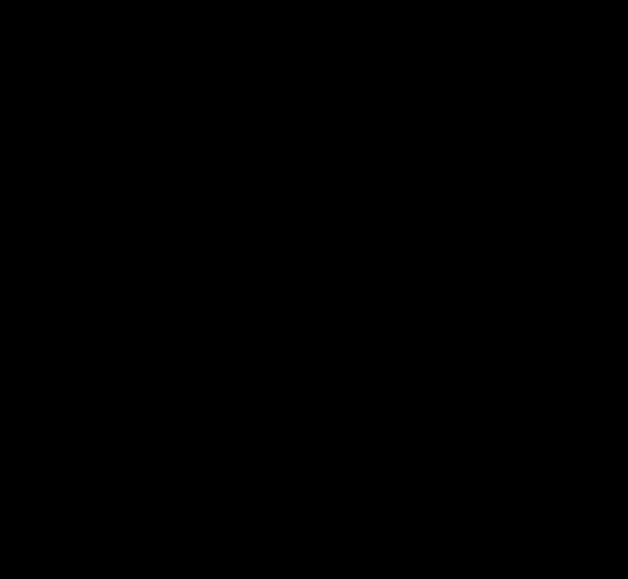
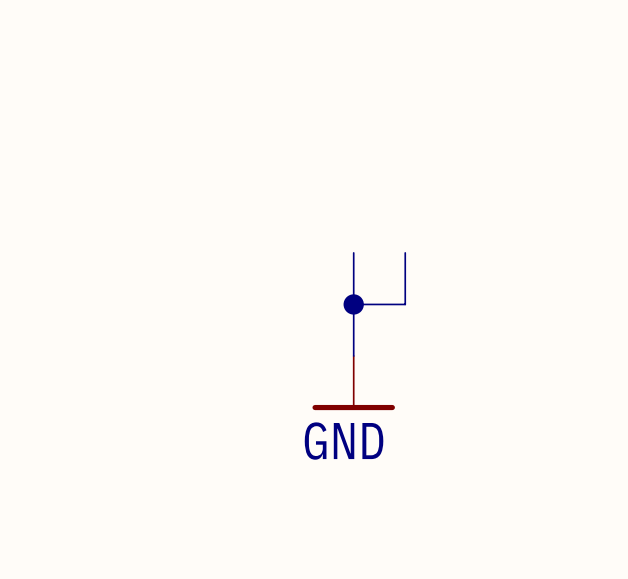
wire: none -> (353, 252) (353, 355)
wire: none -> (405, 252) (405, 304) (353, 304)
junction: none -> (353, 304)
power symbol: none -> GND (353, 383)

